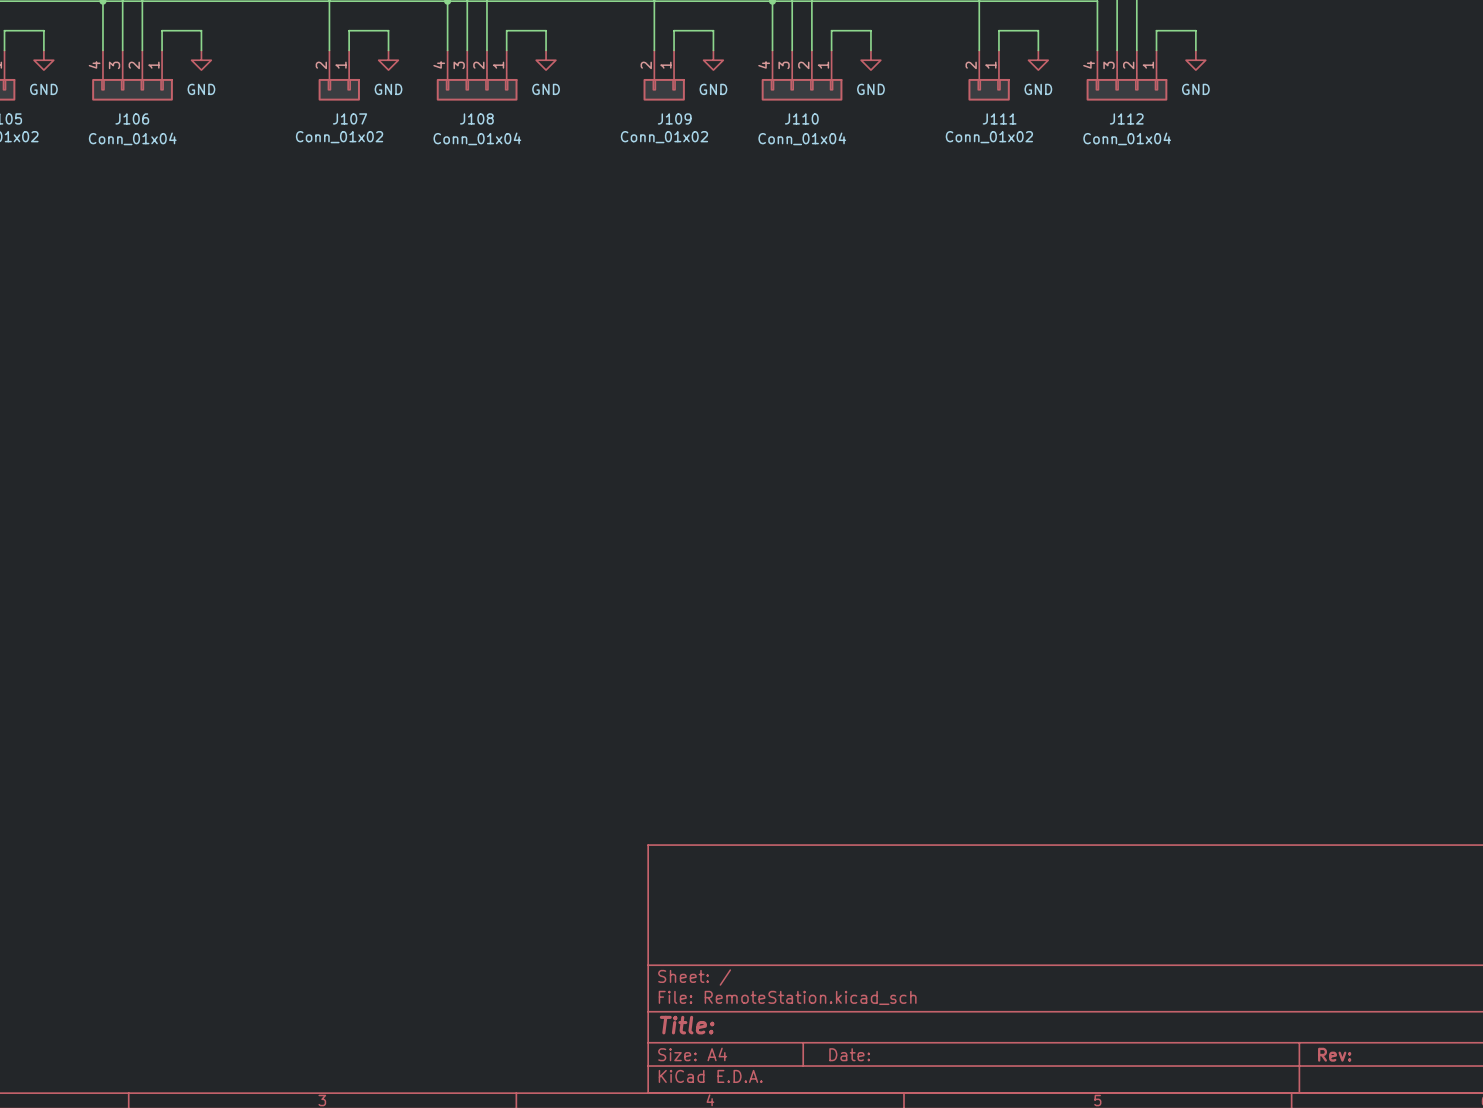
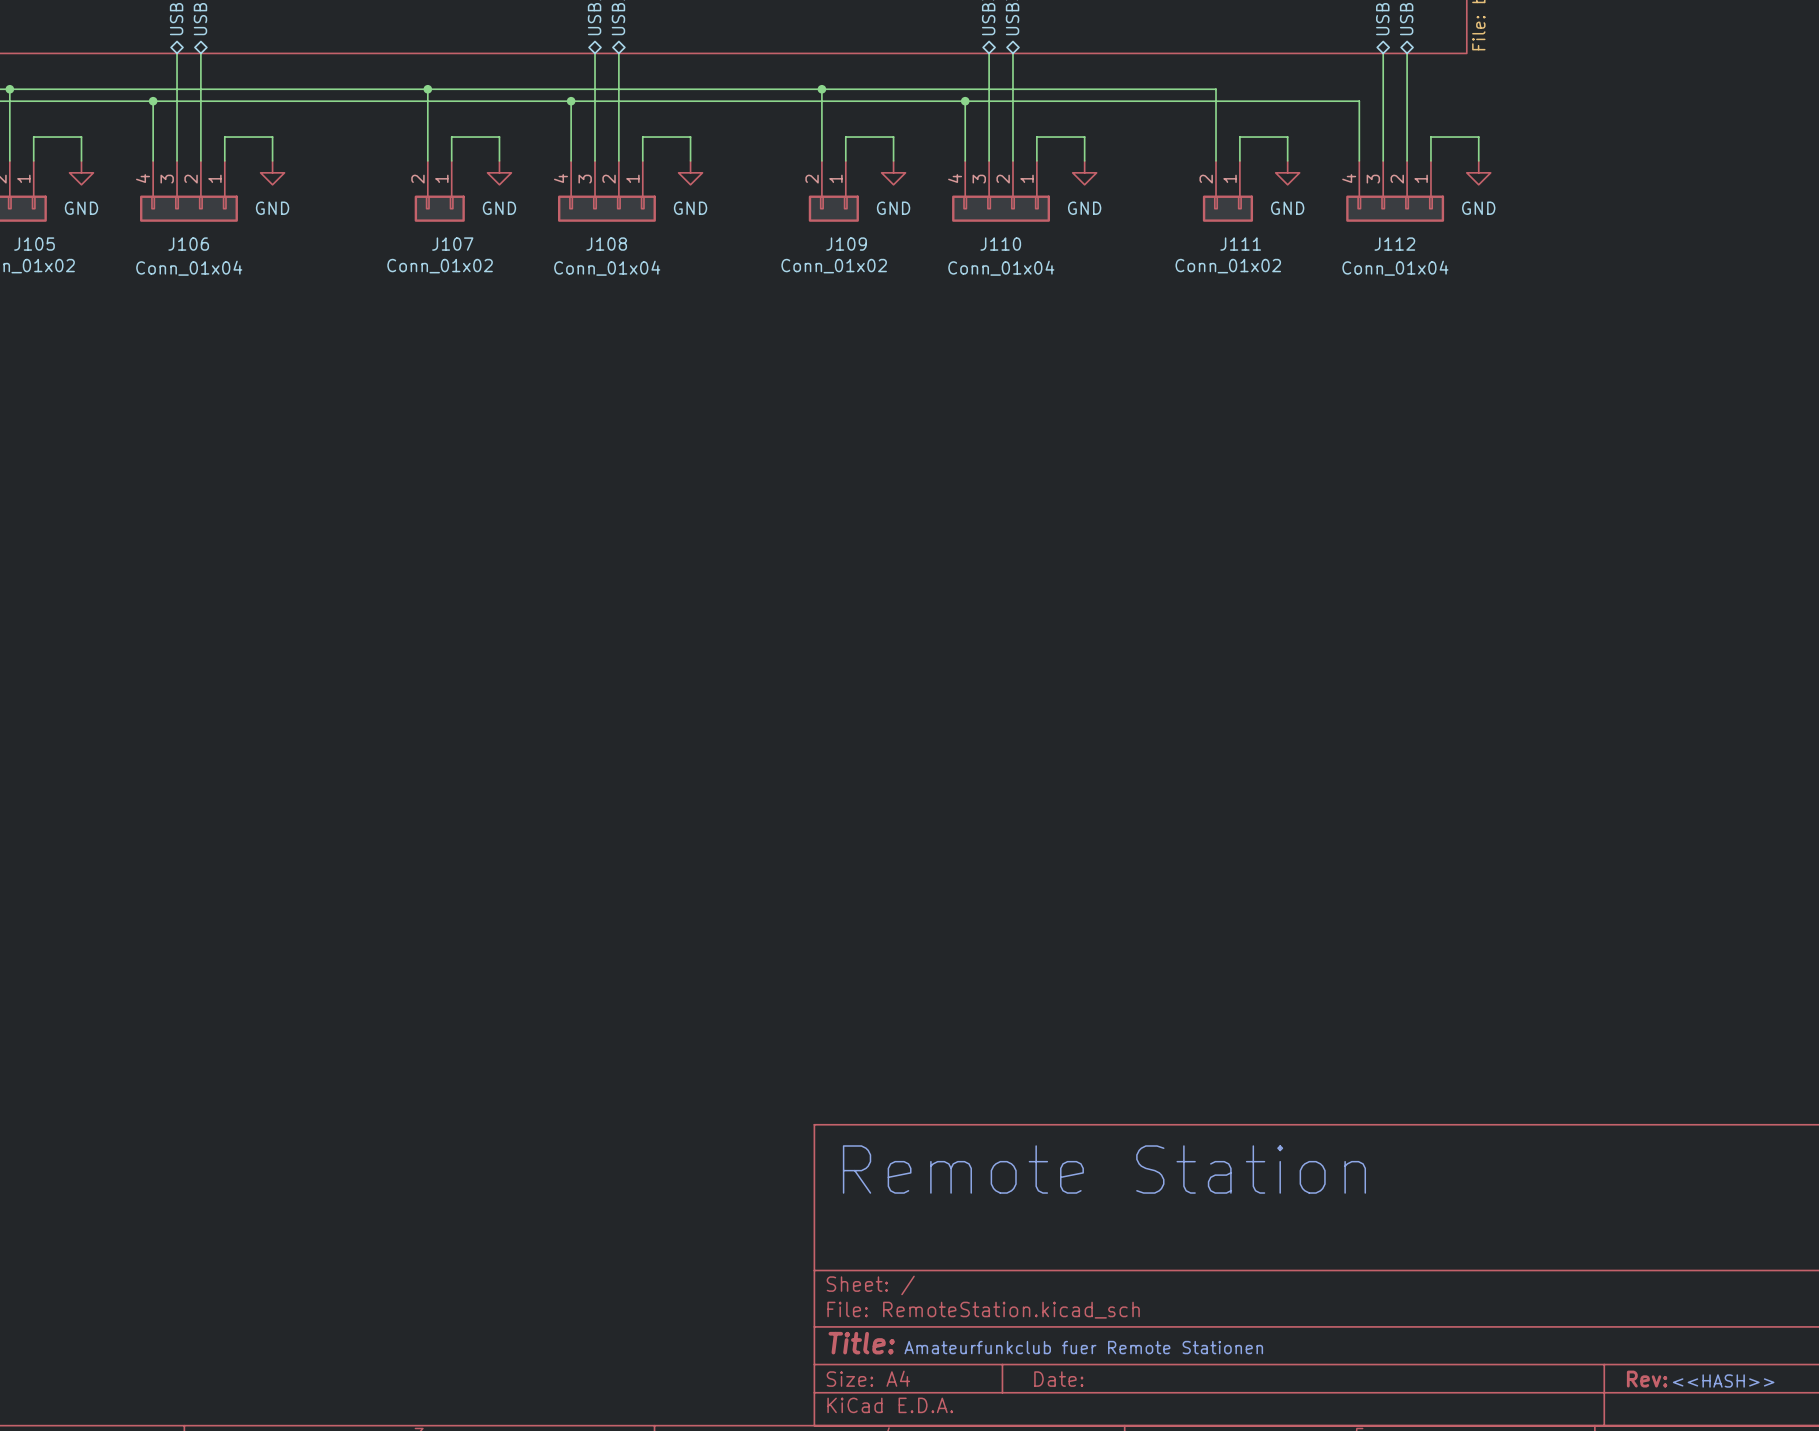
text: none -> Remote Station (1104, 1169)
text: none -> Amateurfunkclub fuer Remote Stationen (1083, 1347)
text: none -> <<HASH>> (1723, 1381)

